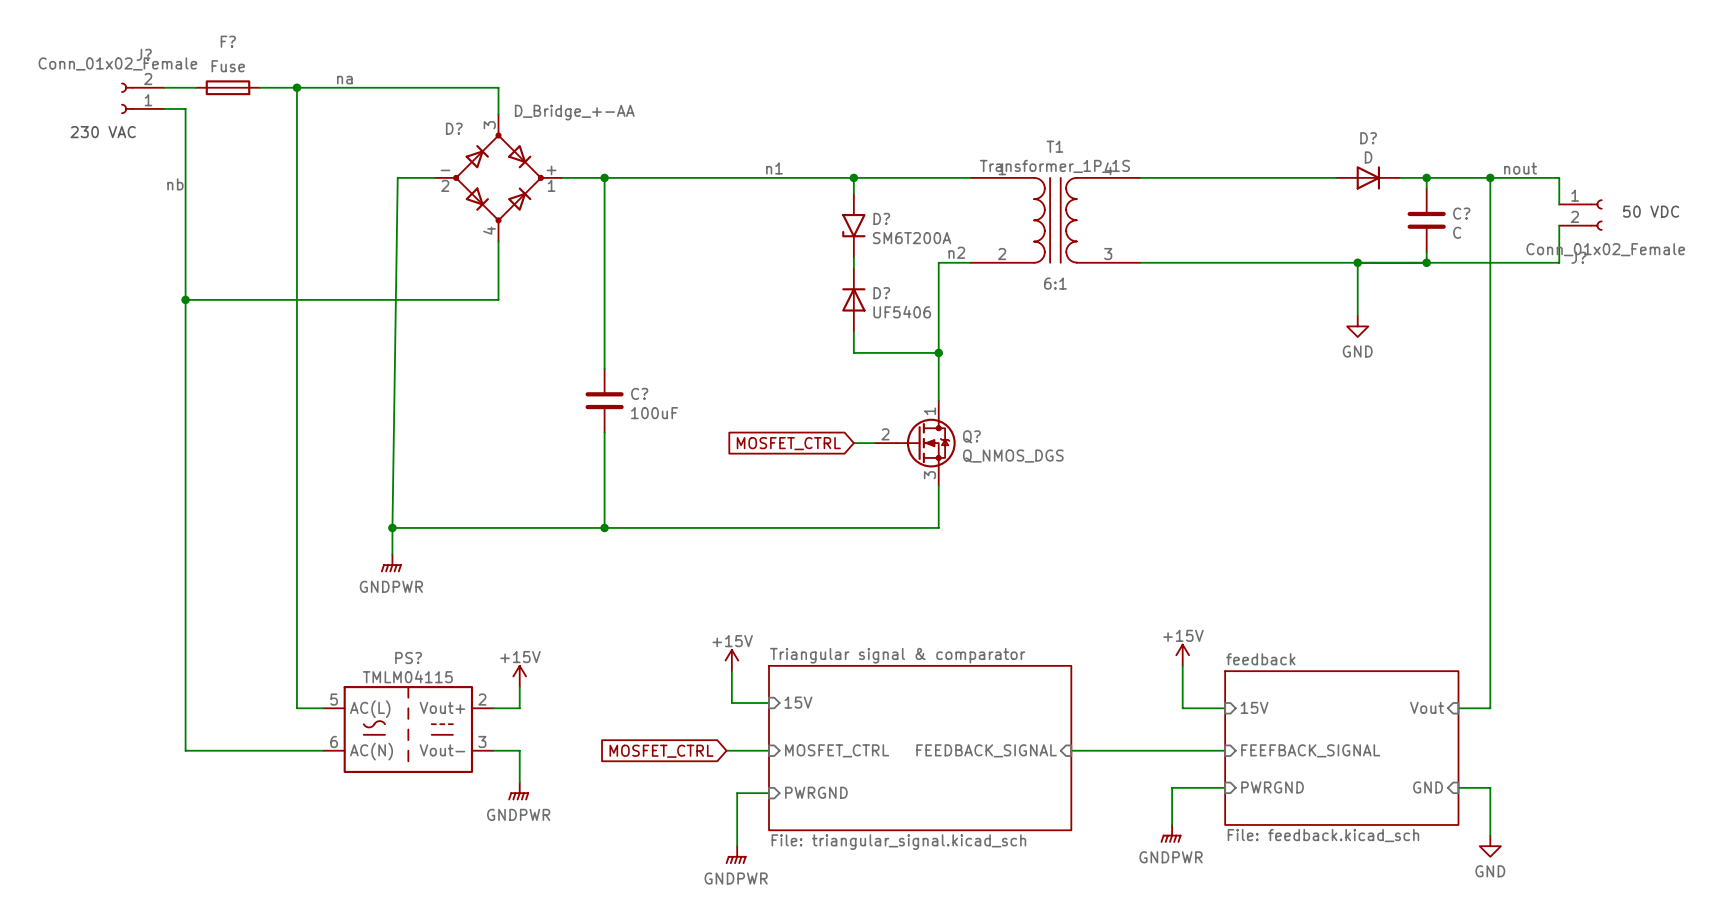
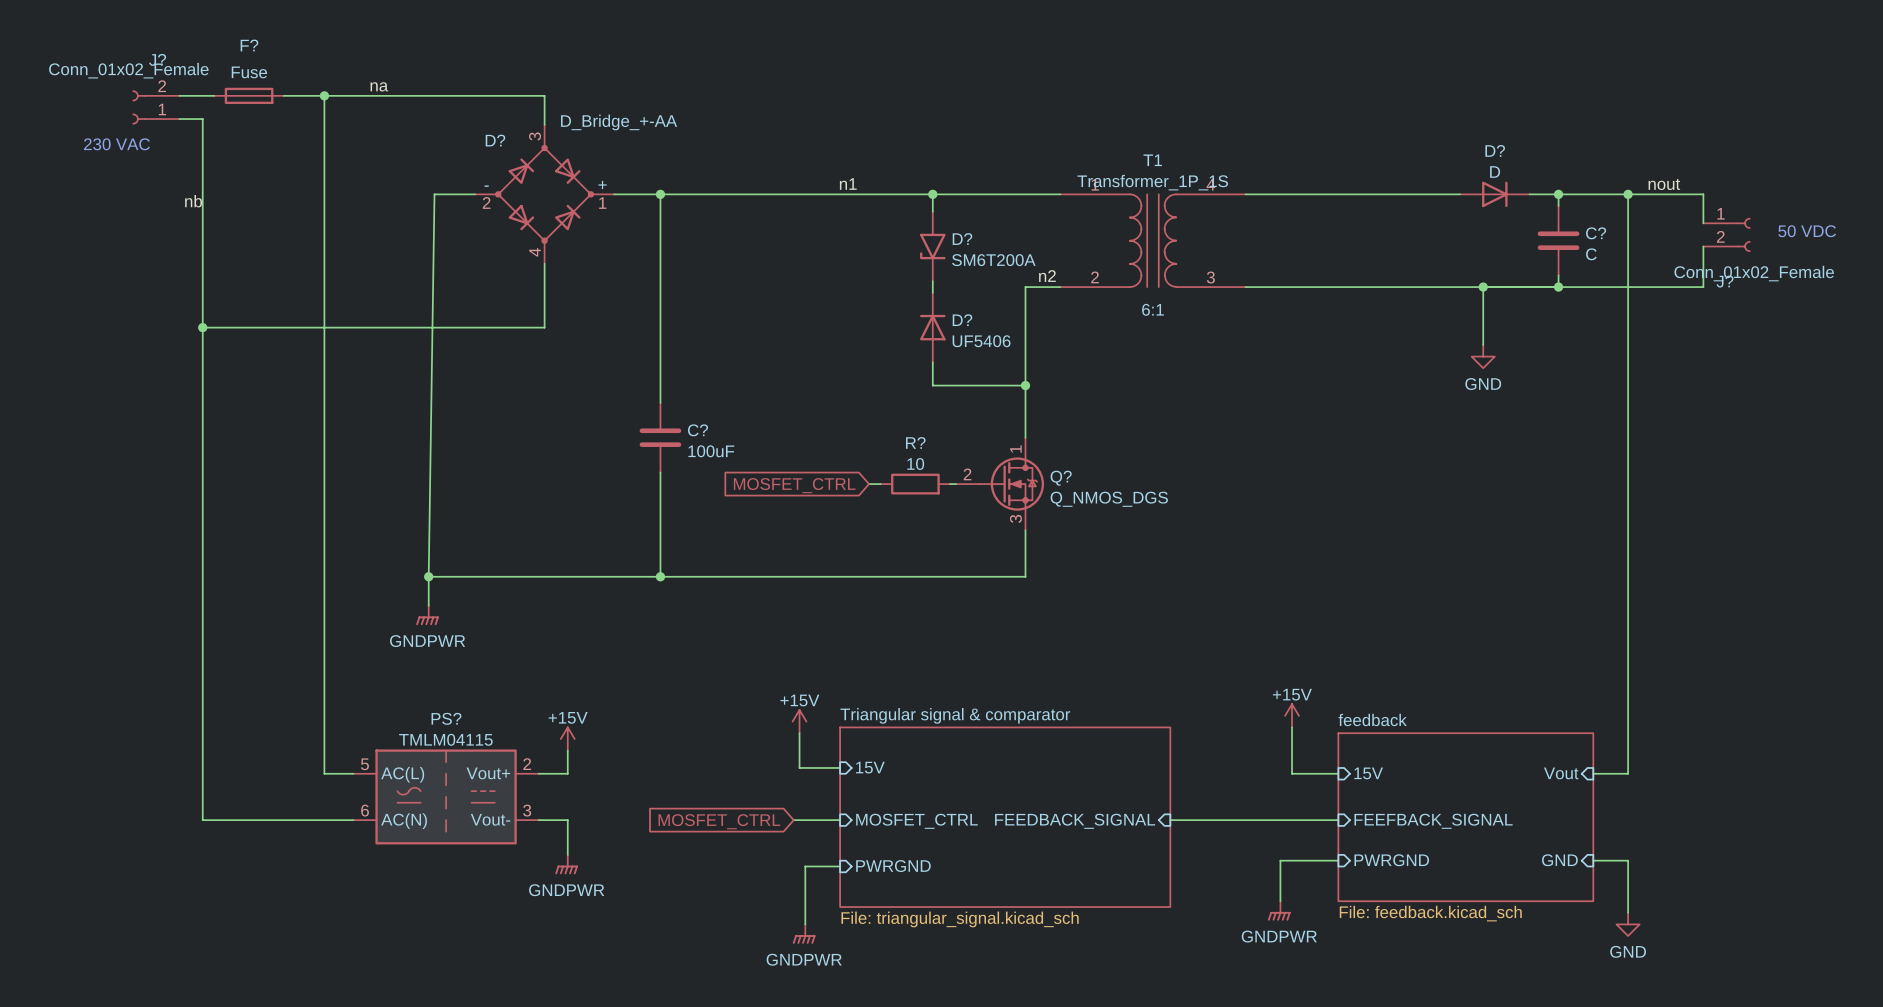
global label position: MOSFET_CTRL (788, 443) -> MOSFET_CTRL (794, 485)
wire: none -> (869, 484) (880, 484)
R?: none -> 10 (915, 484)

